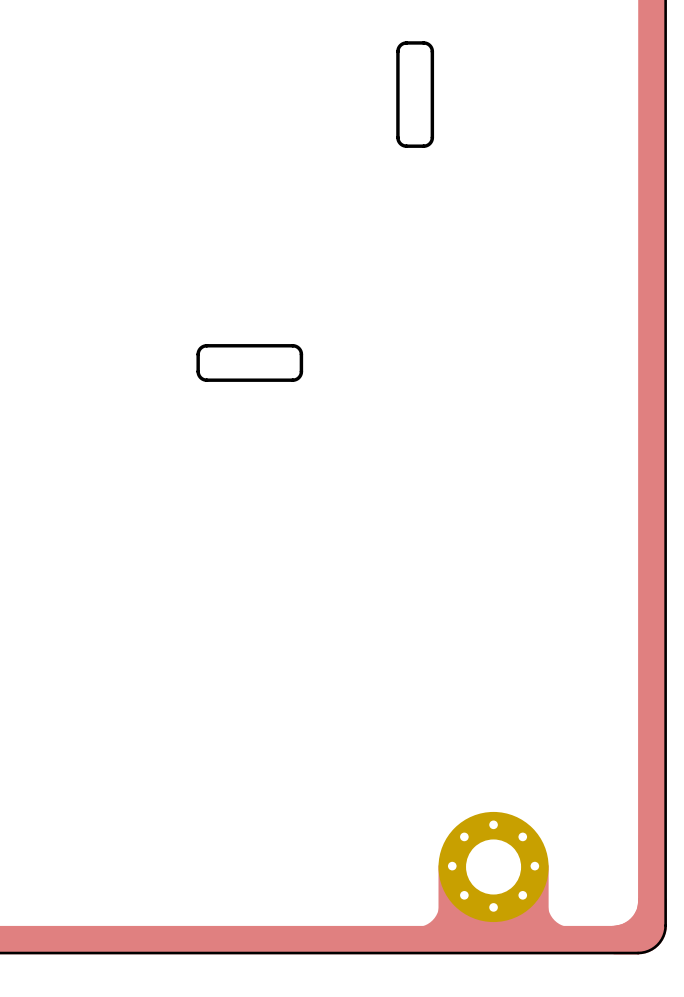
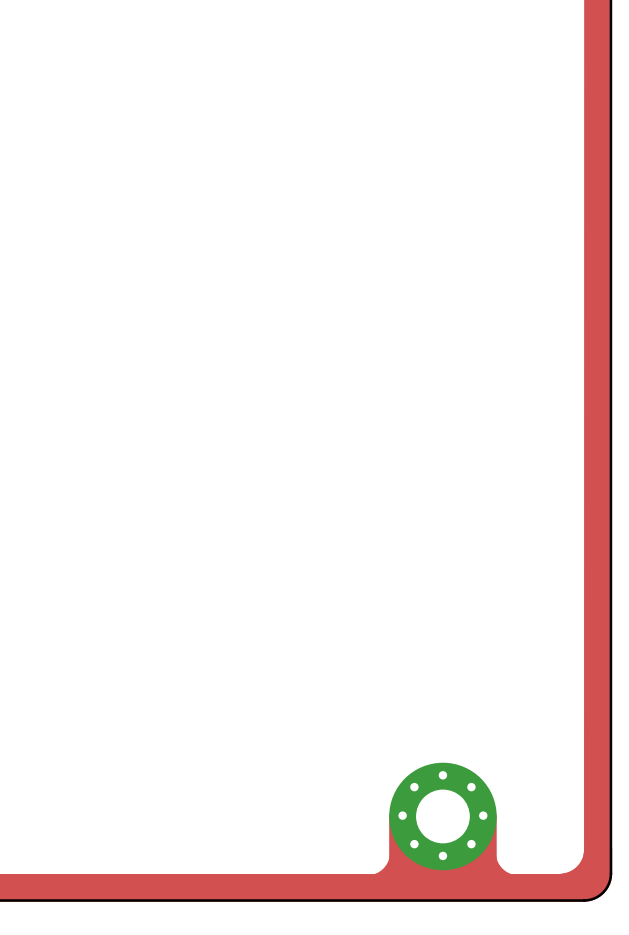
board edge: (406, 42) (425, 43) (432, 50) (432, 138) (429, 143) (424, 146) (404, 145) (398, 138) (398, 50) (400, 45) (406, 42) -> none
board edge: (206, 345) (295, 346) (301, 352) (301, 373) (298, 378) (292, 380) (204, 379) (198, 373) (198, 354) (200, 348) (206, 345) -> none

